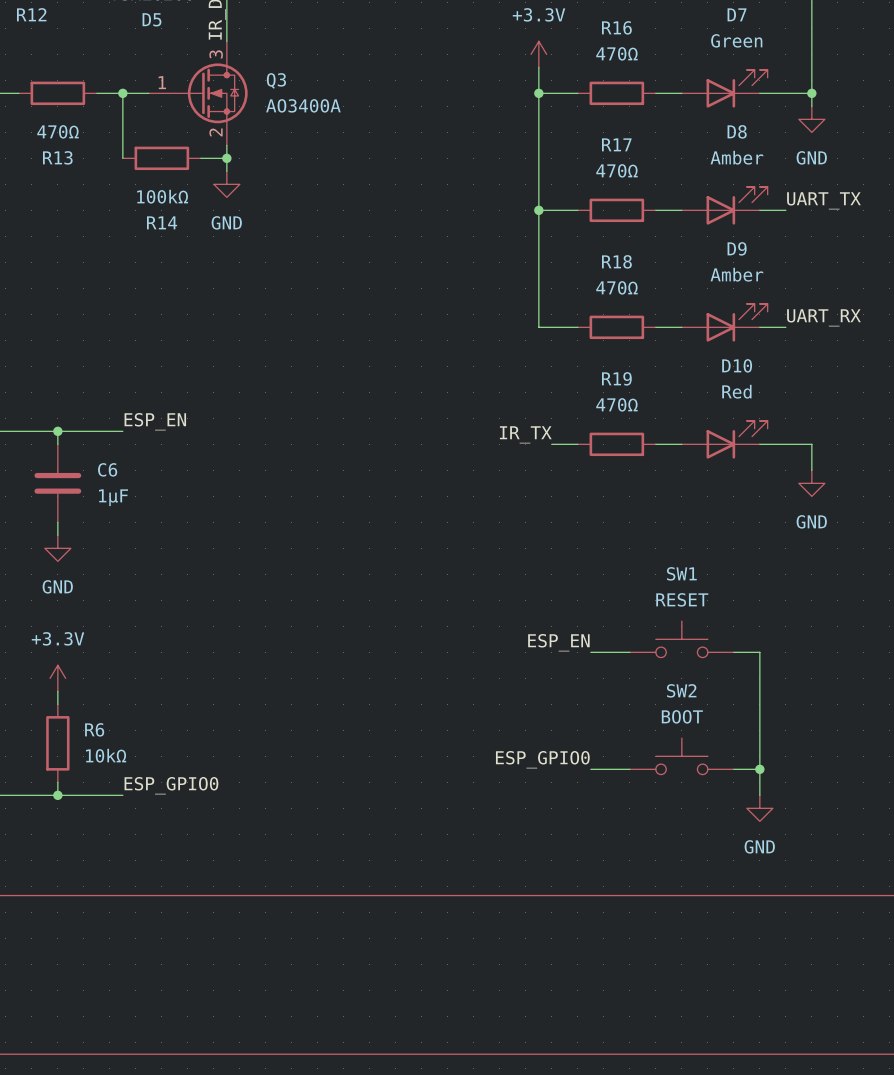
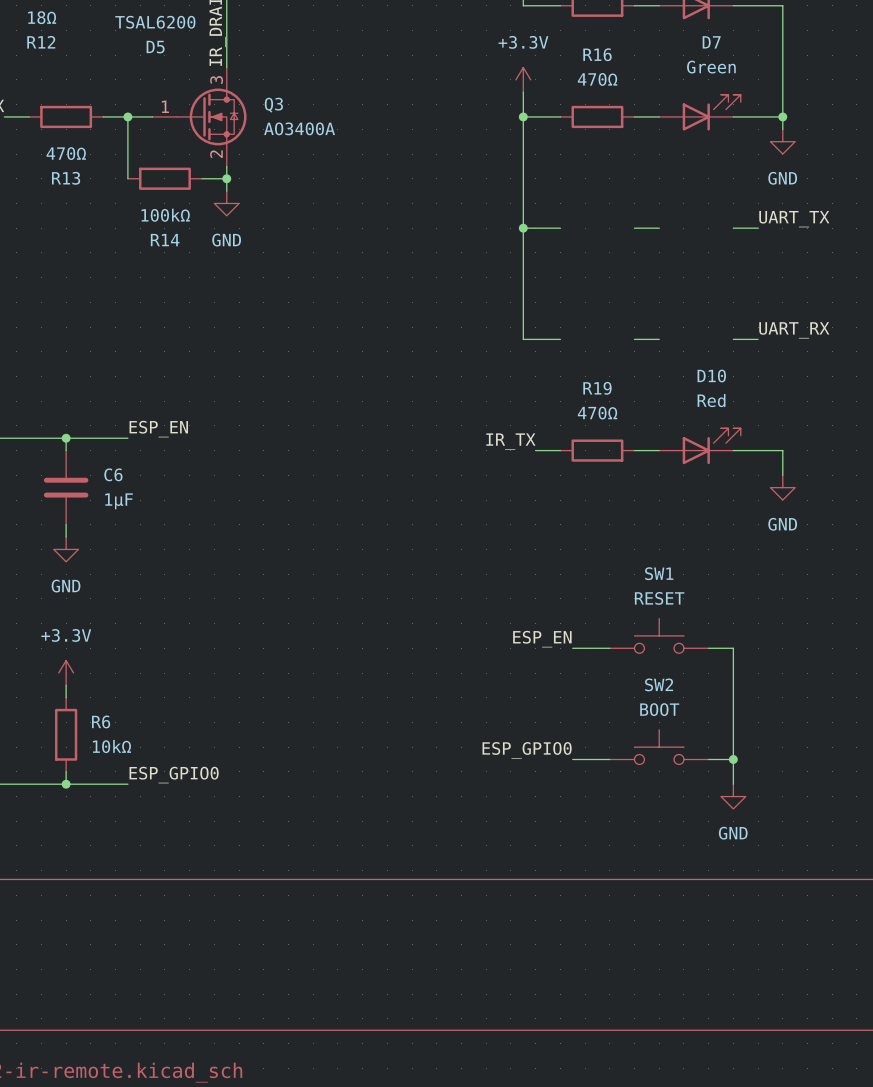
D8: Amber (724, 205) -> none
R17: 470Ω (616, 210) -> none
D9: Amber (724, 322) -> none
R18: 470Ω (616, 327) -> none

